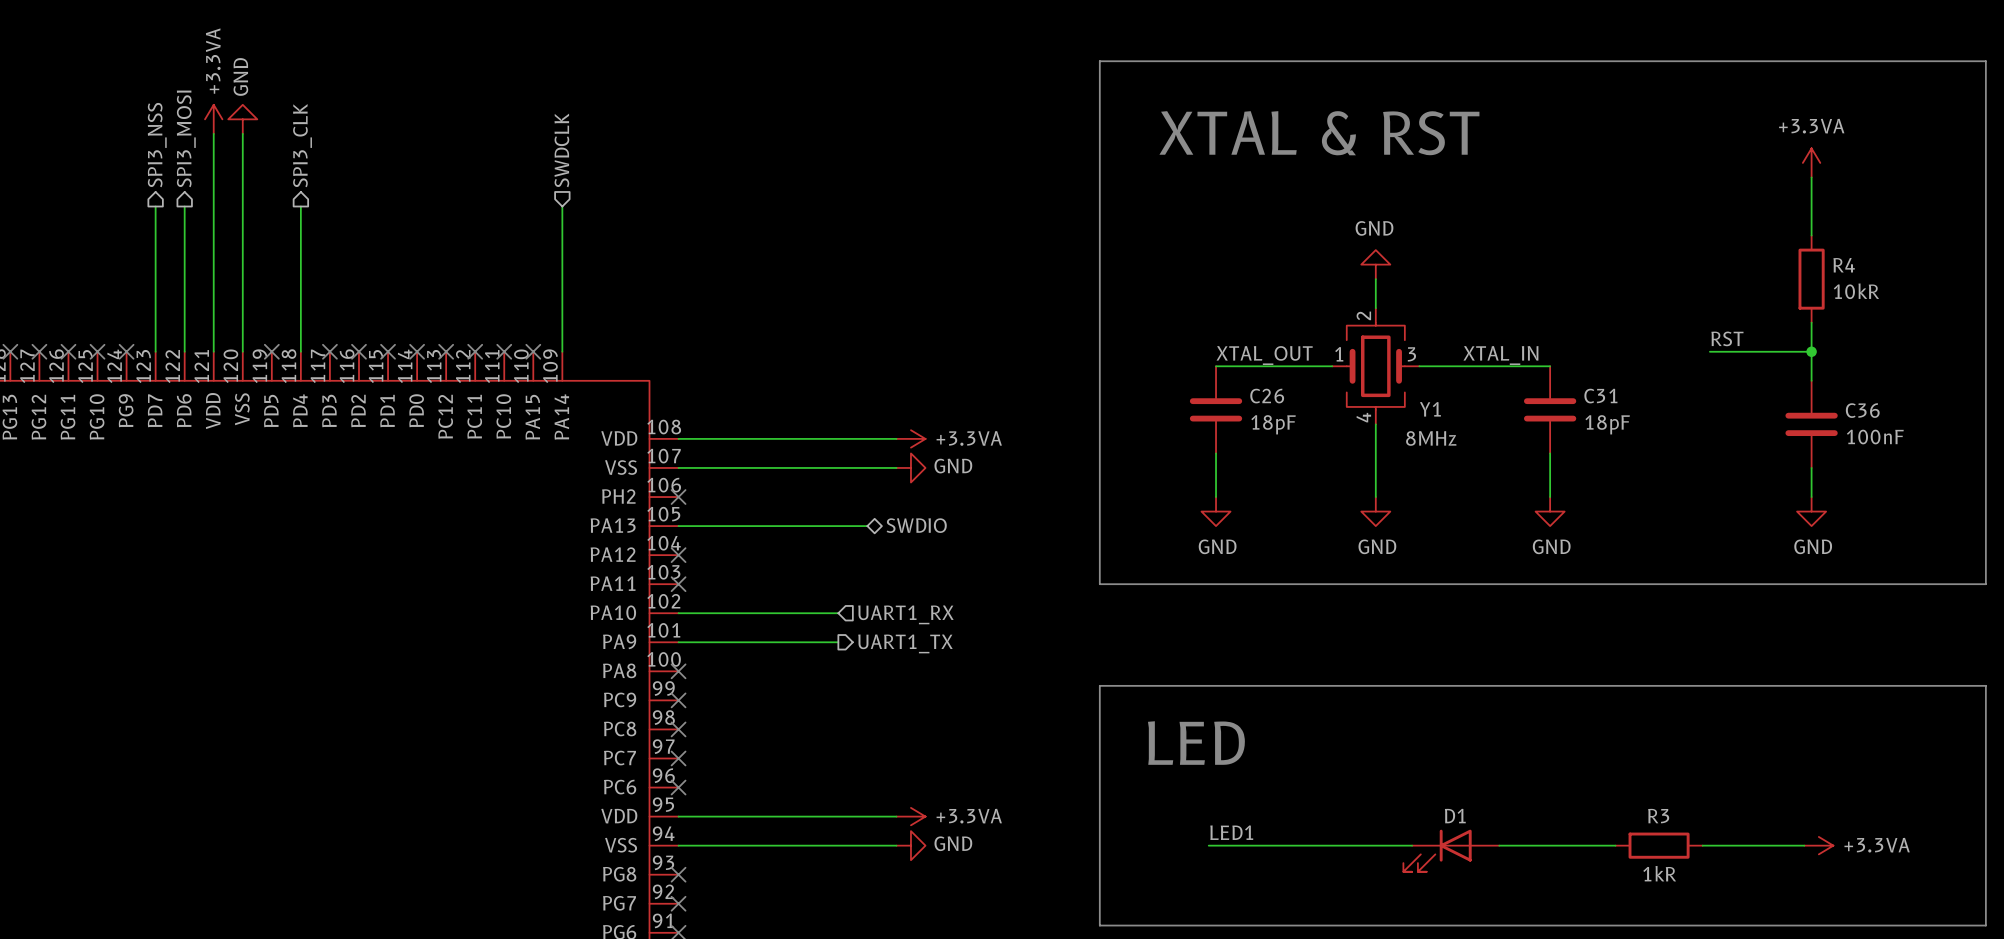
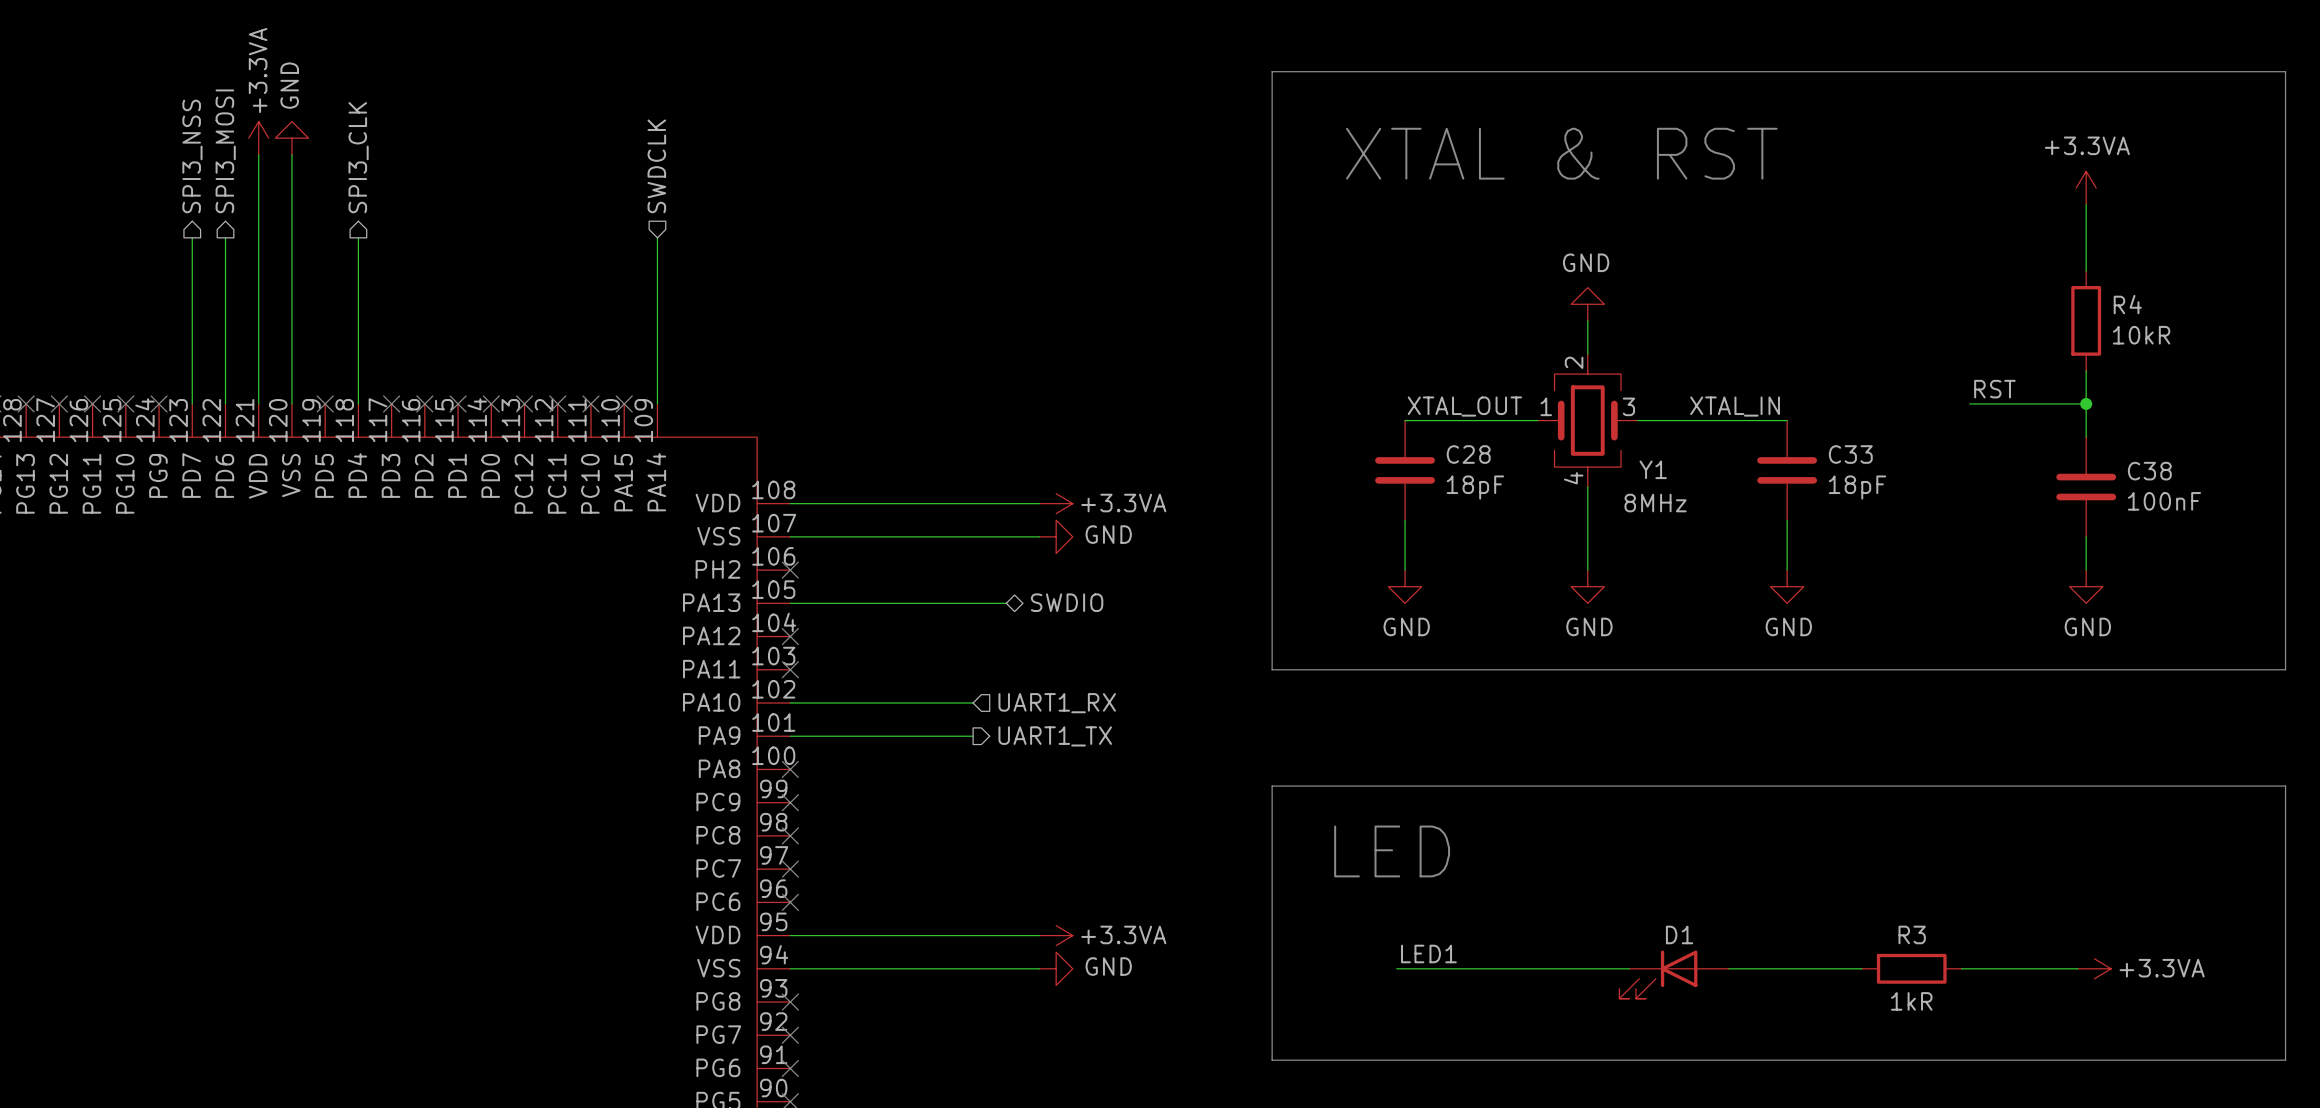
C26 name: C26 (1267, 396) -> C28 (1468, 454)
C31 name: C31 (1600, 396) -> C33 (1850, 454)
C36 name: C36 (1862, 410) -> C38 (2149, 471)

